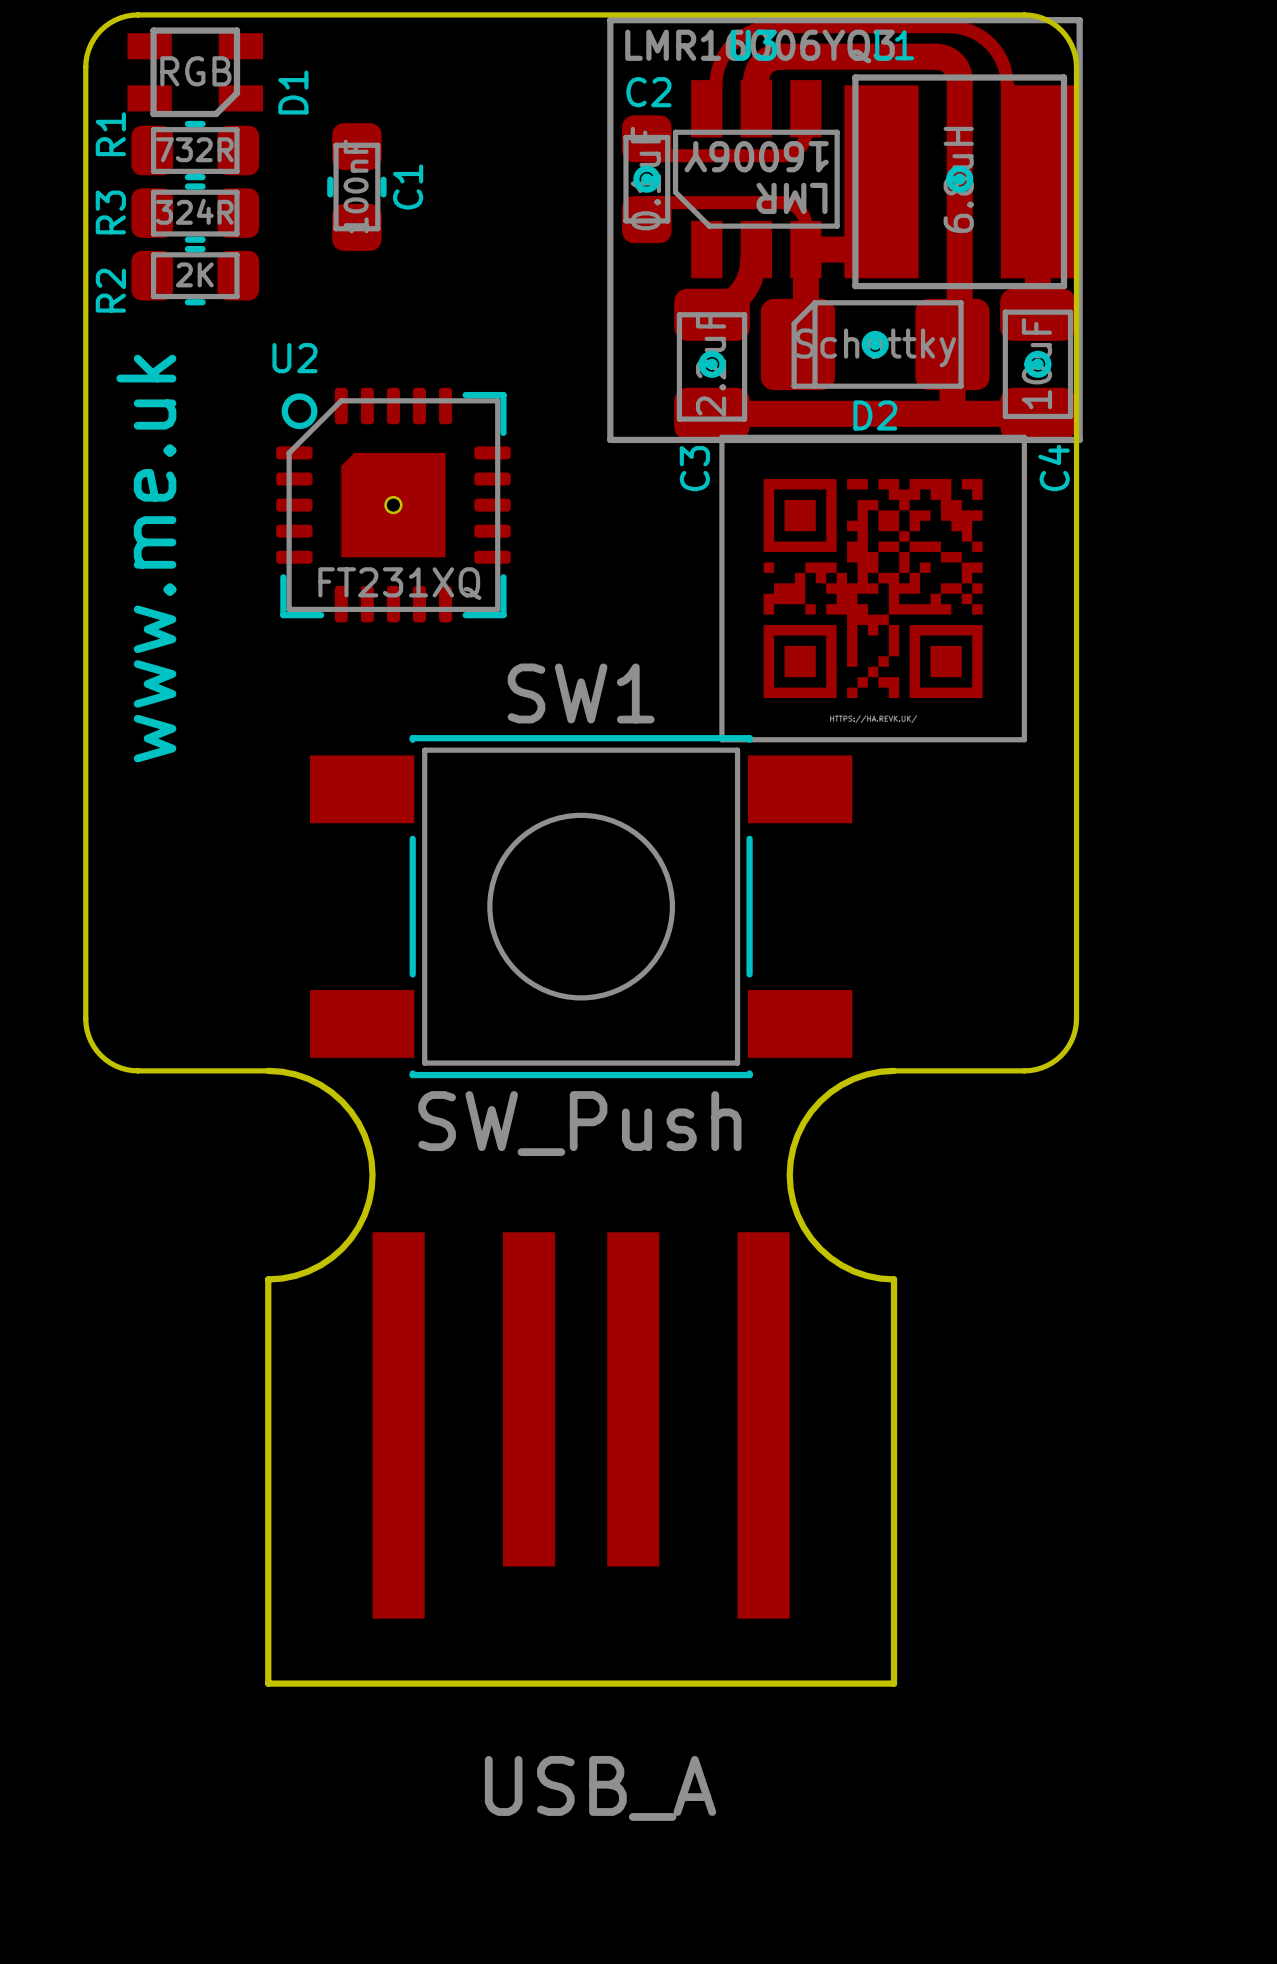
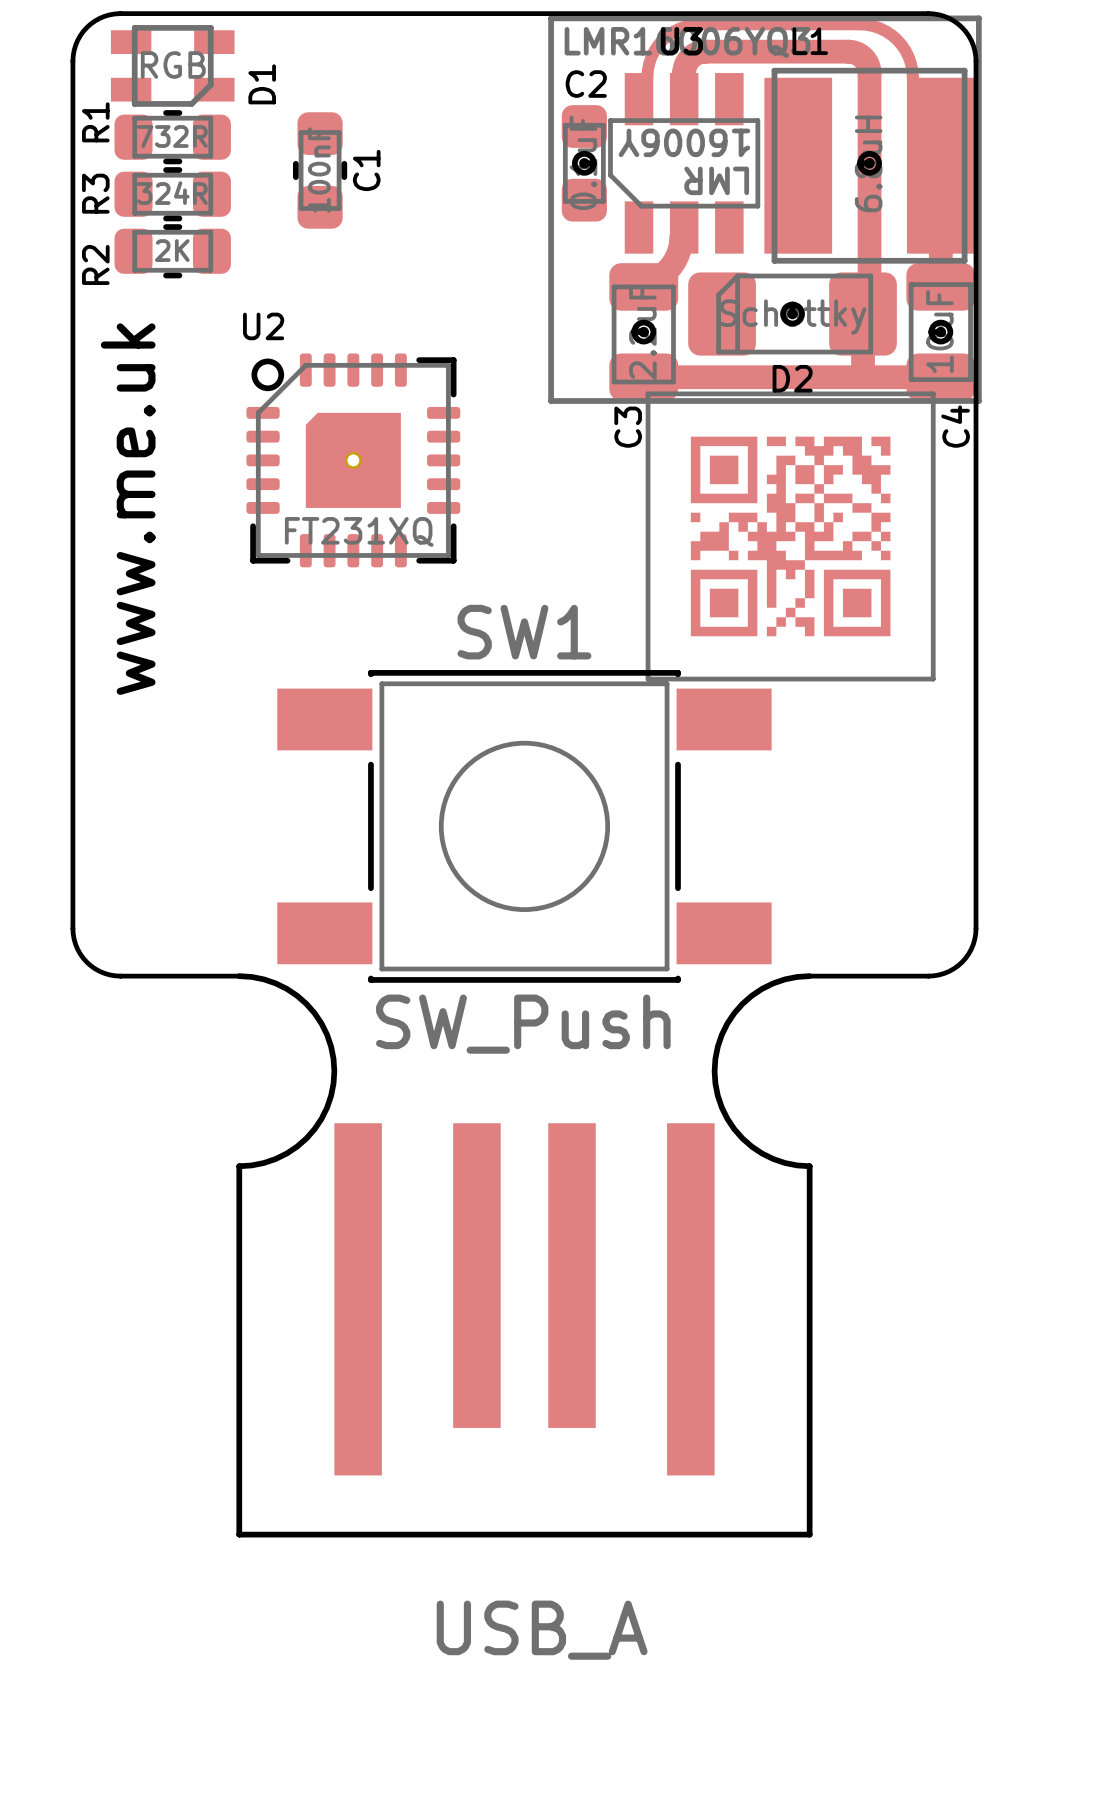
U3 footprint: [607, 17, 1083, 444] -> [548, 15, 982, 404]
part footprint: [719, 434, 1027, 743] -> [645, 391, 936, 682]

